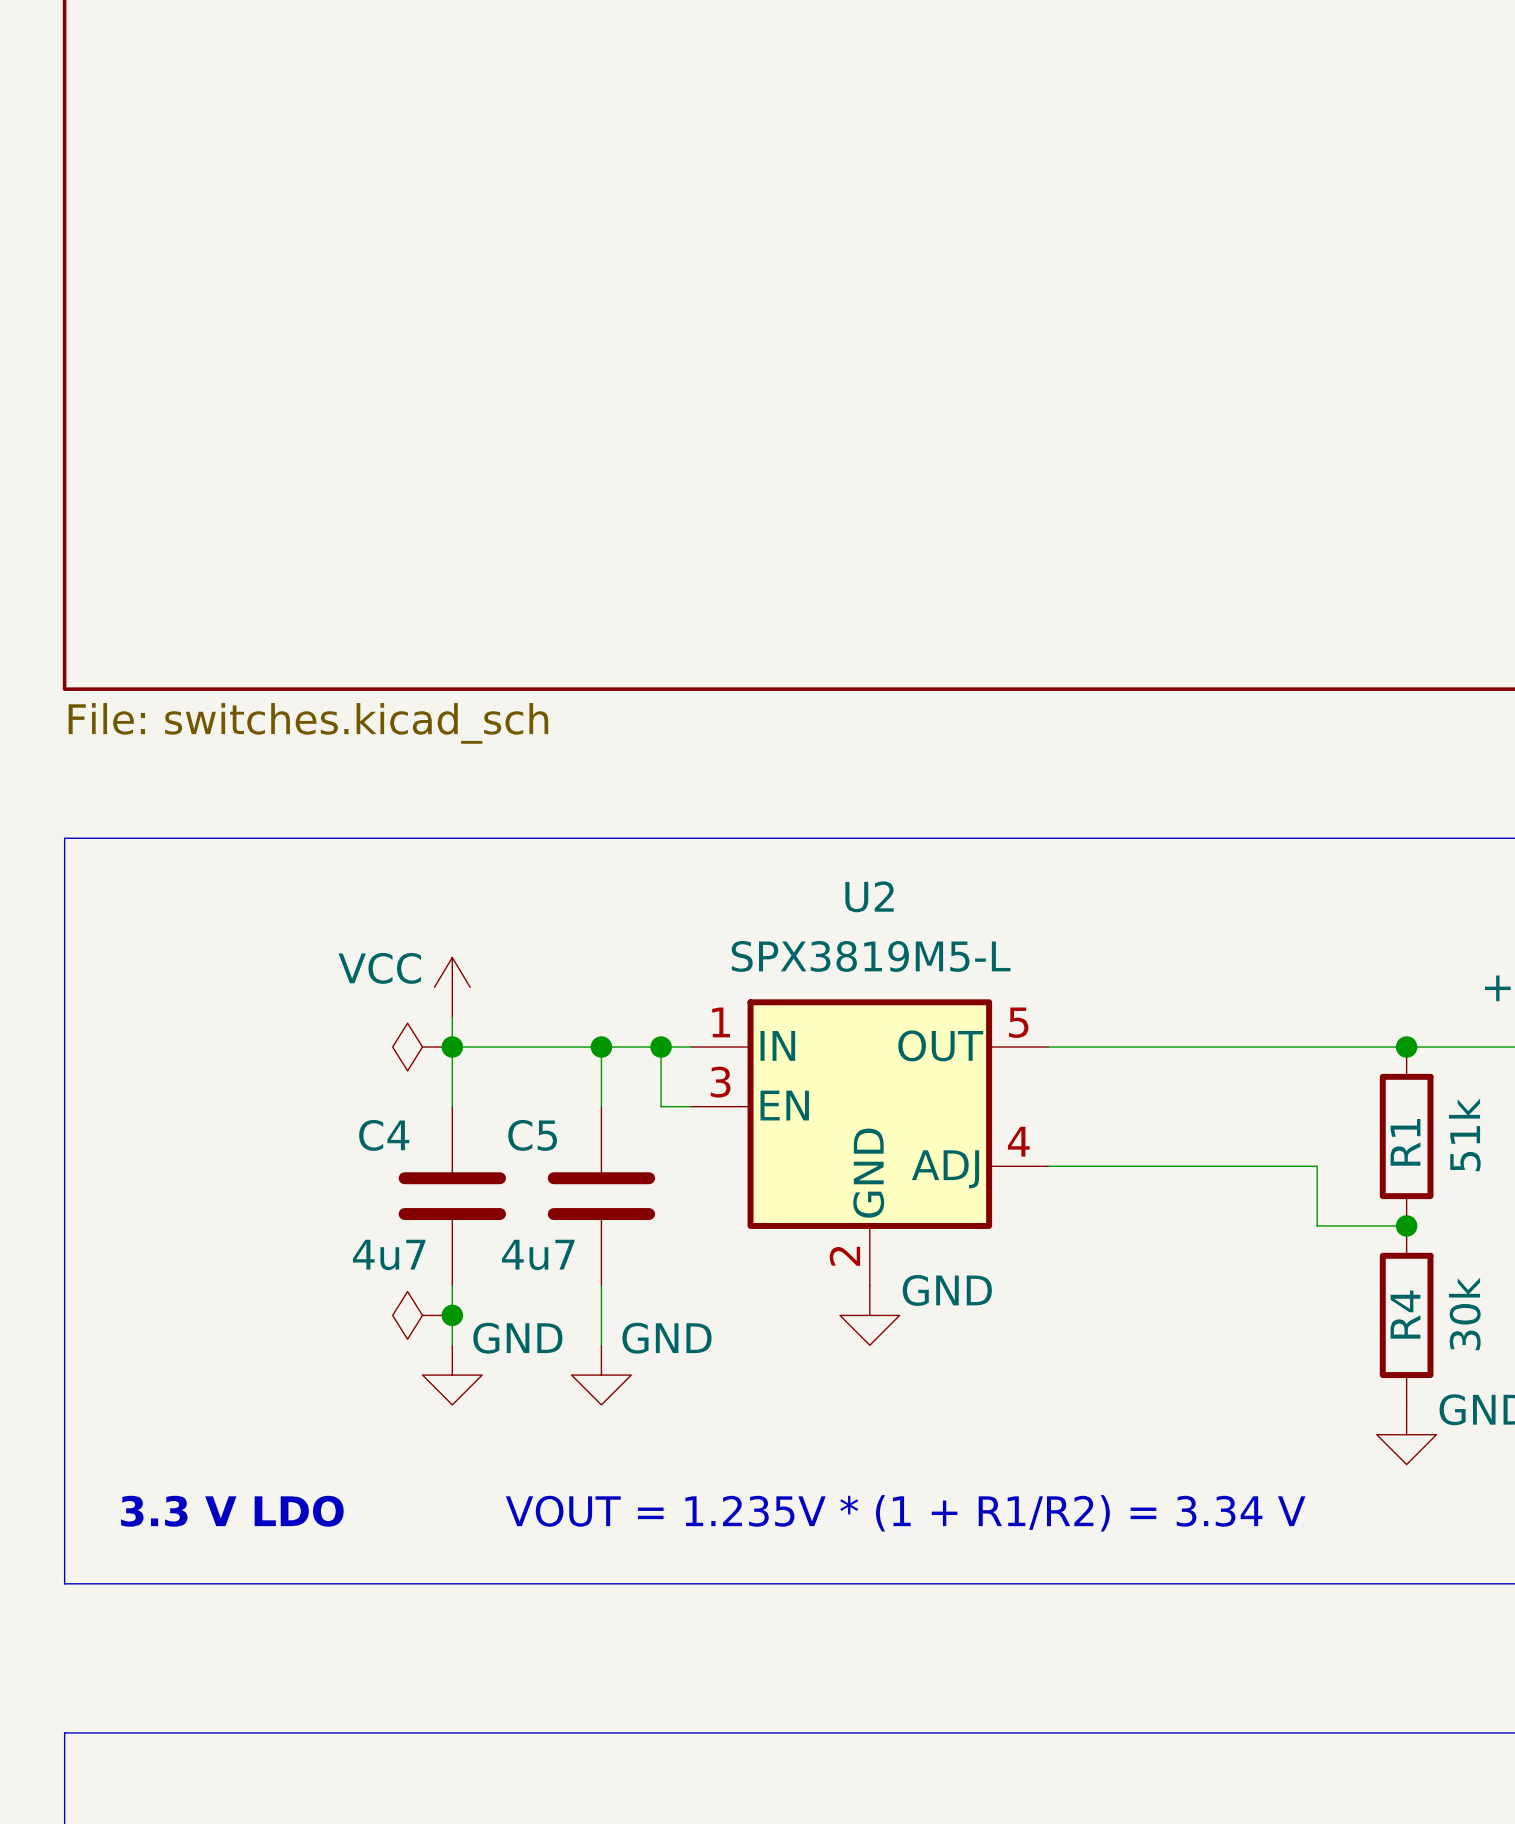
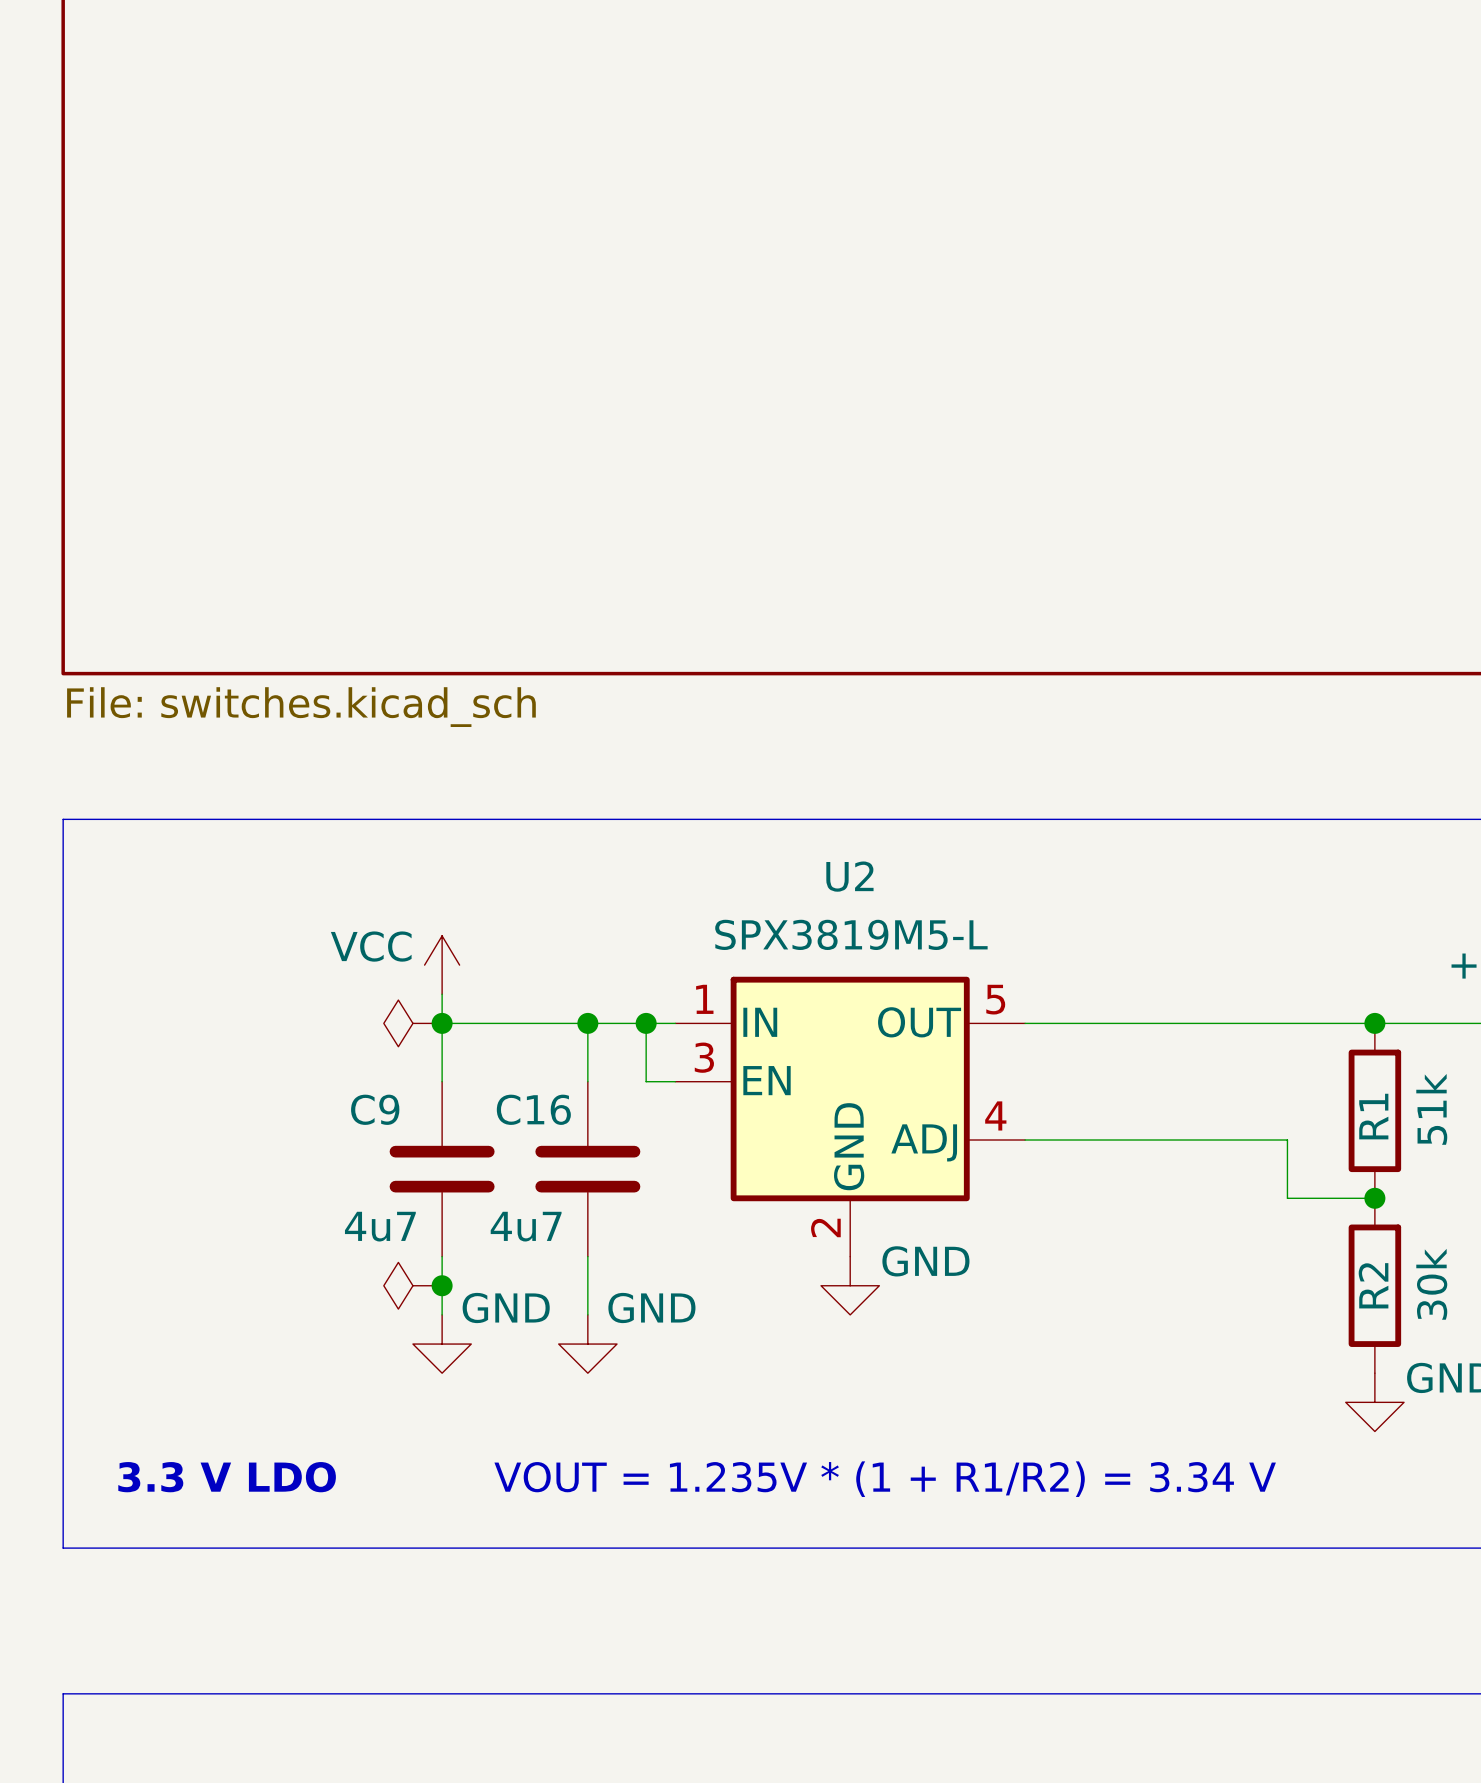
C4 name: C4 (384, 1135) -> C9 (375, 1109)
C5 name: C5 (532, 1135) -> C16 (533, 1109)
R4 name: R4 (1405, 1314) -> R2 (1373, 1285)

